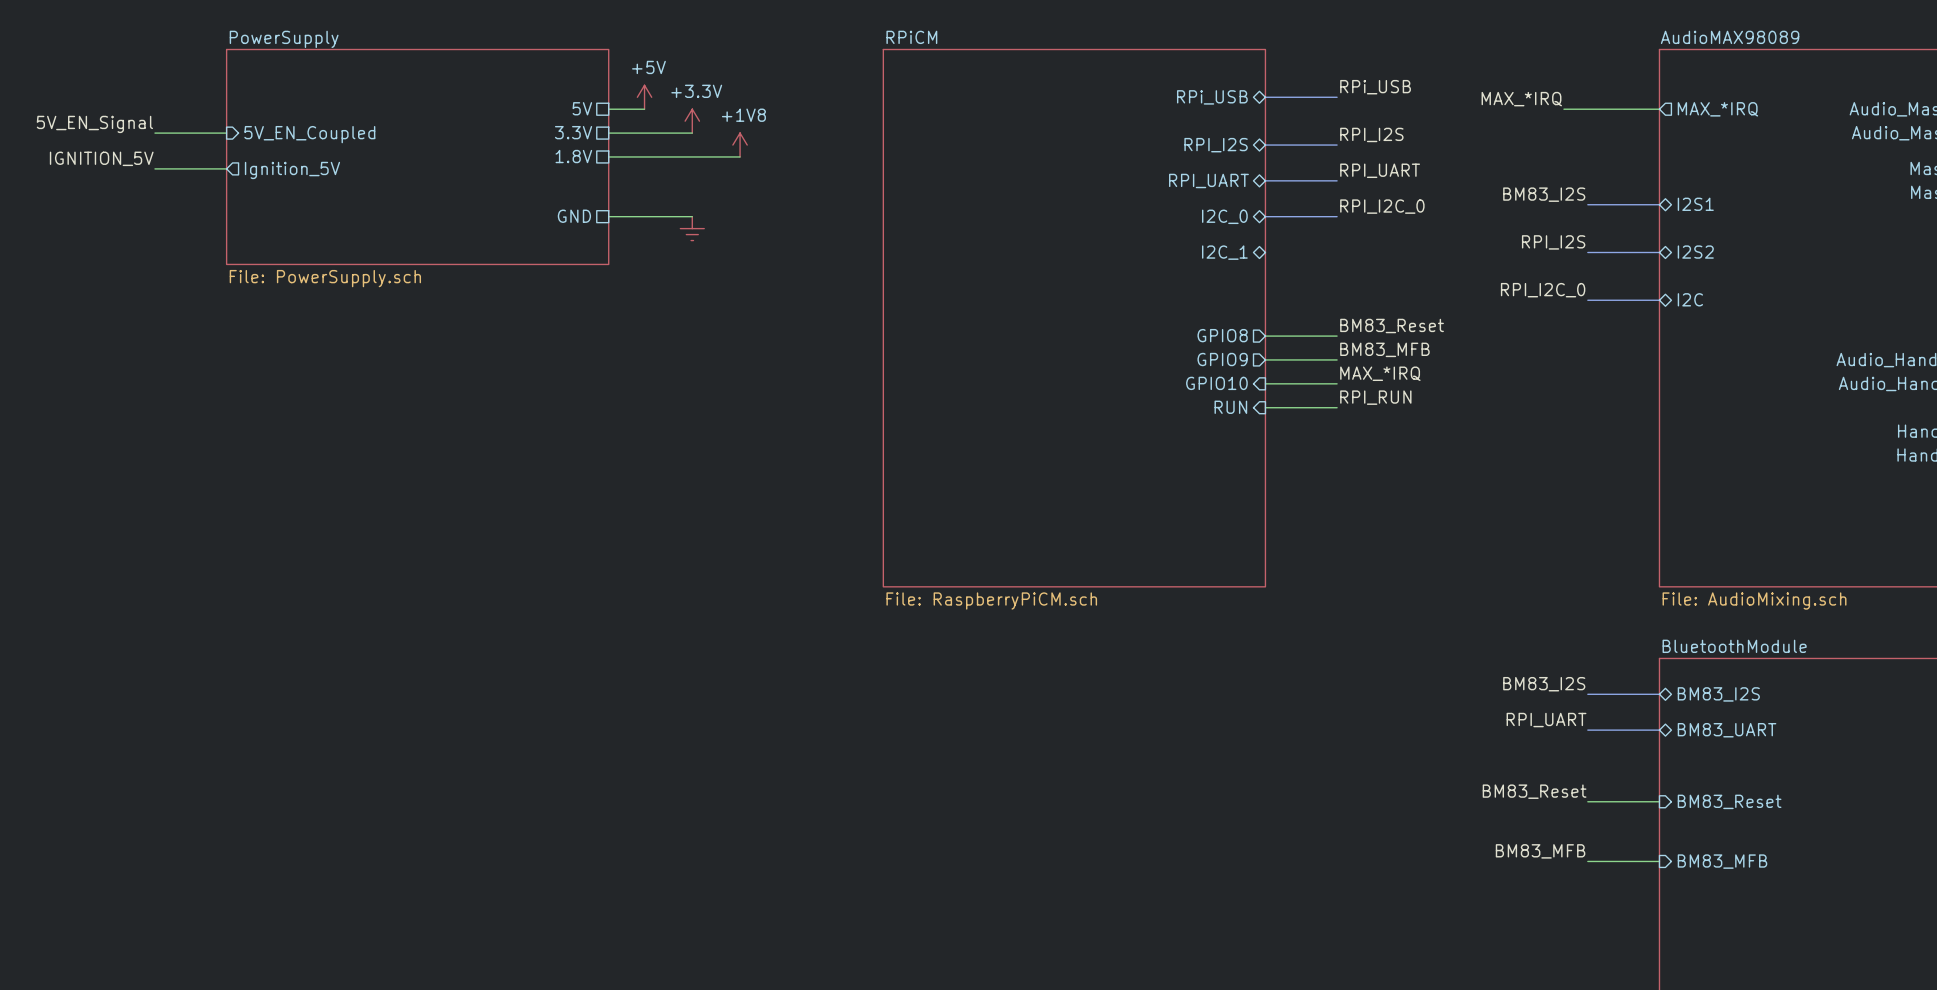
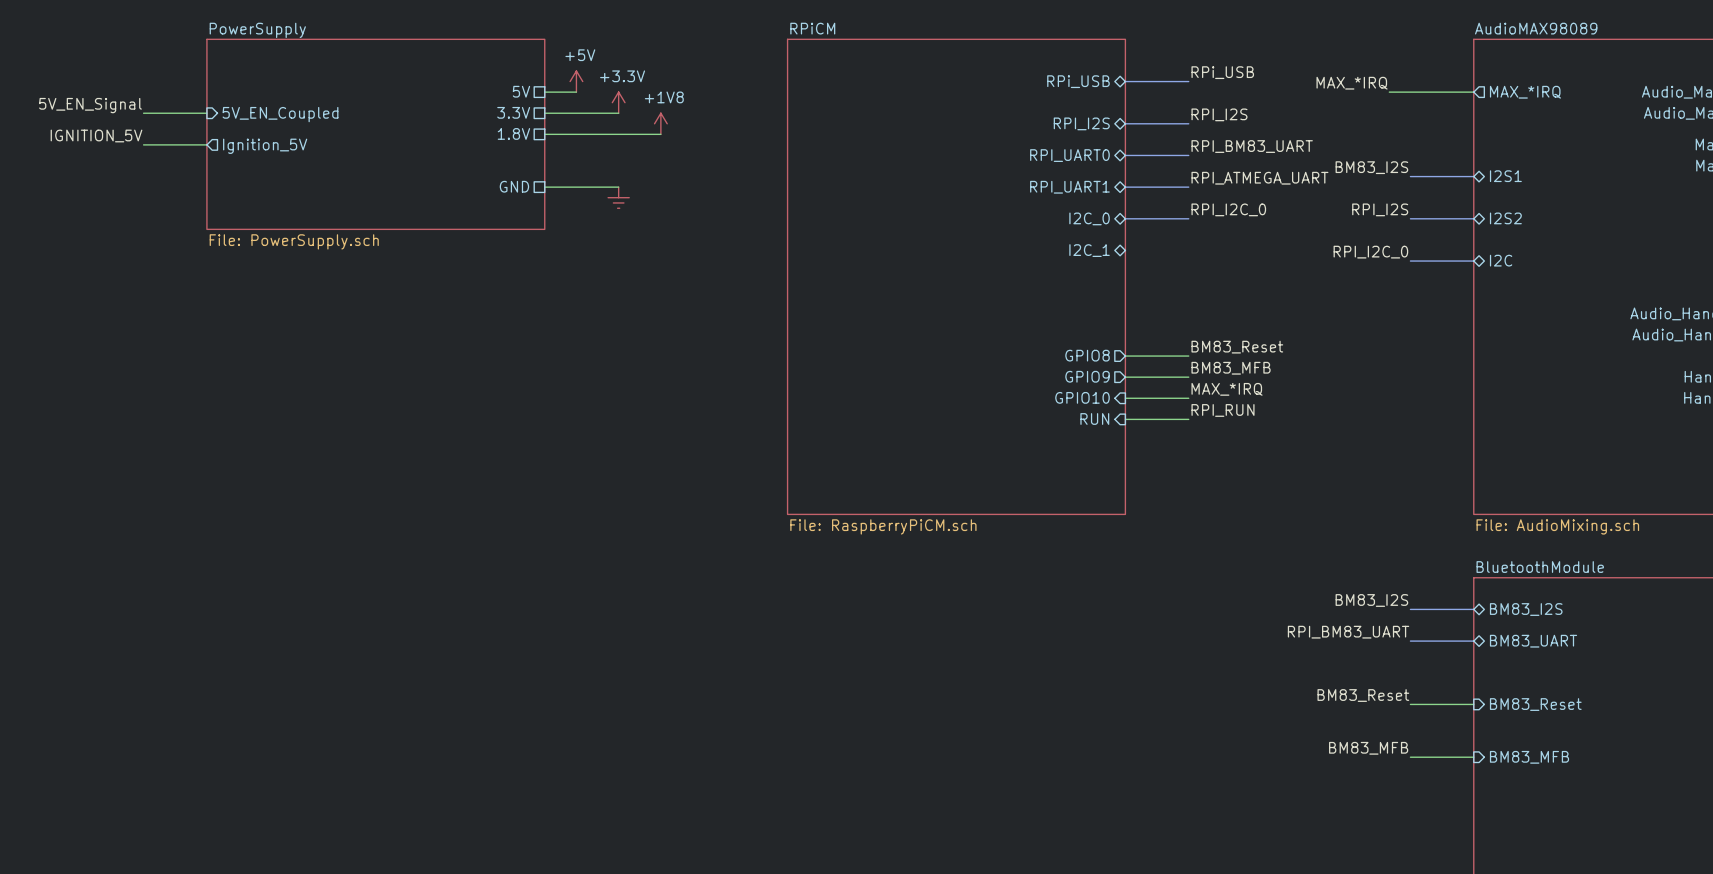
label: RPI_UART (1380, 170) -> RPI_BM83_UART (1252, 146)
sheet pin: RPI_UART (1208, 180) -> RPI_UART0 (1069, 155)
label: RPI_I2C_0 (1382, 206) -> RPI_ATMEGA_UART (1259, 178)
sheet pin: I2C_0 (1224, 216) -> RPI_UART1 (1069, 187)
label: none -> RPI_I2C_0 (1228, 209)
sheet pin: I2C_1 (1224, 252) -> I2C_0 (1089, 218)
bus: none -> (1125, 218) (1188, 218)
sheet pin: none -> I2C_1 (1089, 250)
label: BM83_Reset (1392, 325) -> none
sheet pin: GPIO8 (1222, 335) -> none
wire: (1265, 336) (1337, 336) -> (1125, 377) (1188, 377)
label position: BM83_MFB (1384, 349) -> BM83_MFB (1231, 368)
sheet pin position: GPIO9 (1222, 359) -> GPIO9 (1087, 376)
wire: (1265, 359) (1337, 359) -> (1125, 398) (1188, 398)
label position: MAX_*IRQ (1380, 373) -> MAX_*IRQ (1227, 389)
sheet pin position: GPIO10 (1216, 383) -> GPIO10 (1082, 397)
wire: (1265, 383) (1337, 383) -> (1125, 419) (1188, 419)
label: RPI_RUN (1375, 397) -> BM83_Reset (1237, 347)
sheet pin shape: input (1230, 407) -> output (1087, 355)
sheet pin: RUN (1230, 407) -> GPIO8 (1087, 355)
label: none -> RPI_RUN (1223, 410)
sheet pin: none -> RUN (1094, 418)
label: RPI_UART (1546, 720) -> RPI_BM83_UART (1348, 632)

